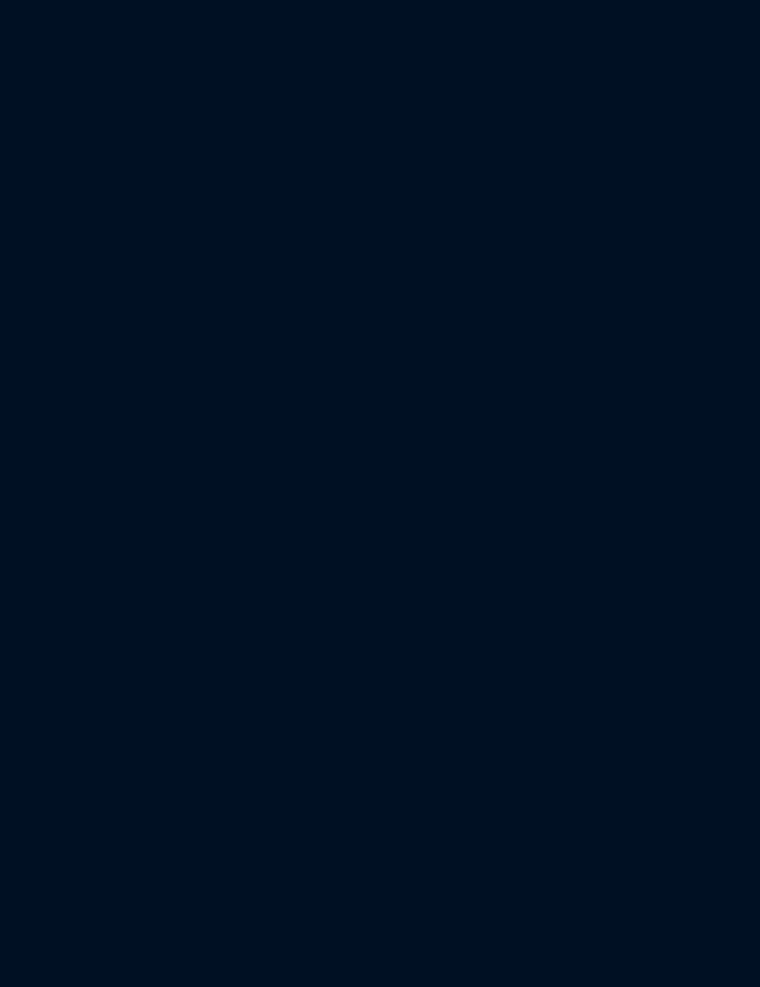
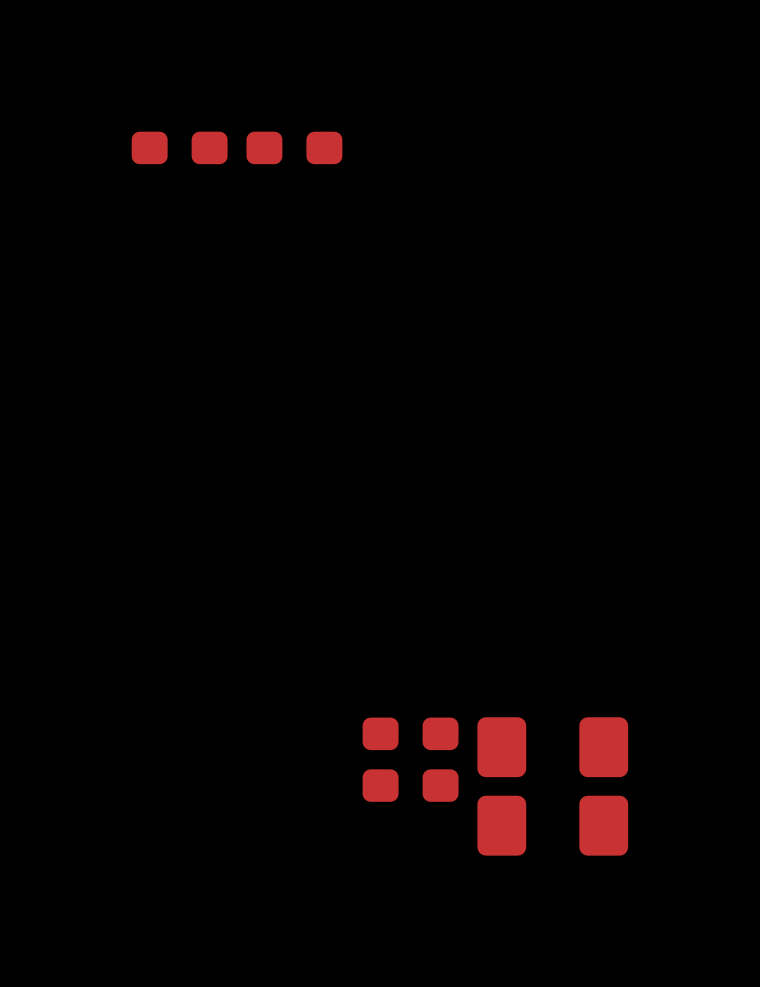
part: none -> (179, 147)
part: none -> (294, 147)
part: none -> (410, 733)
part: none -> (552, 747)
part: none -> (410, 785)
part: none -> (552, 825)

